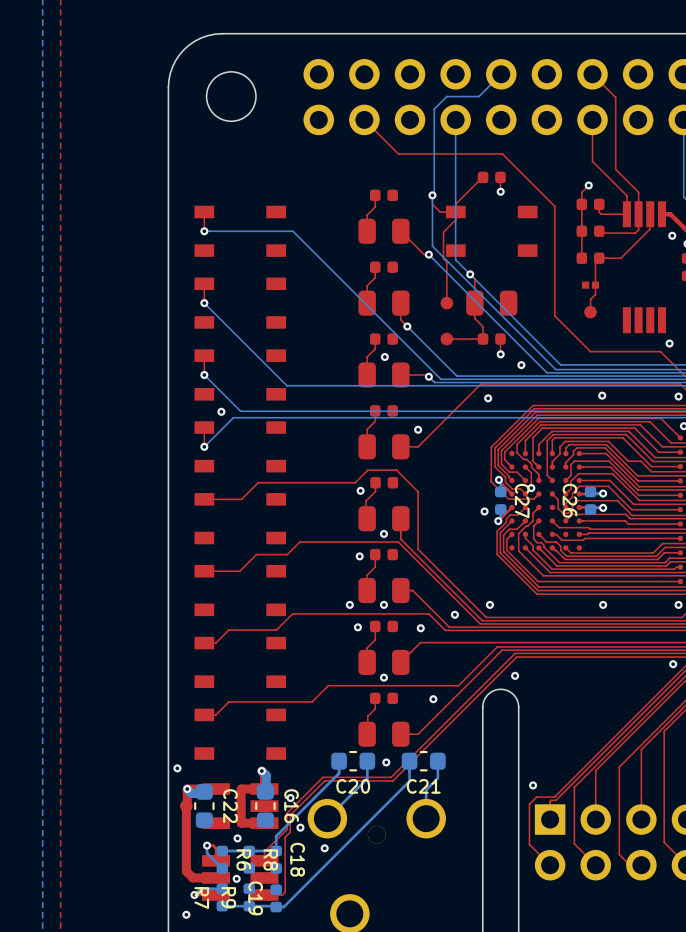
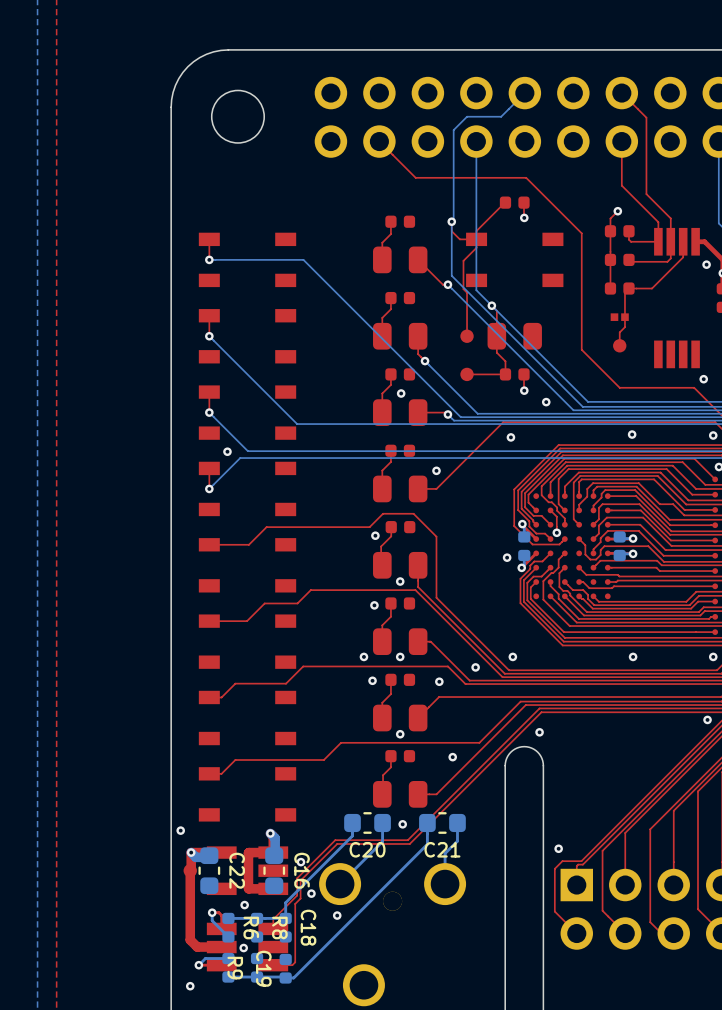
C26 name: C26 (570, 500) -> none
C27 name: C27 (522, 501) -> none
R7 name: R7 (201, 898) -> none

